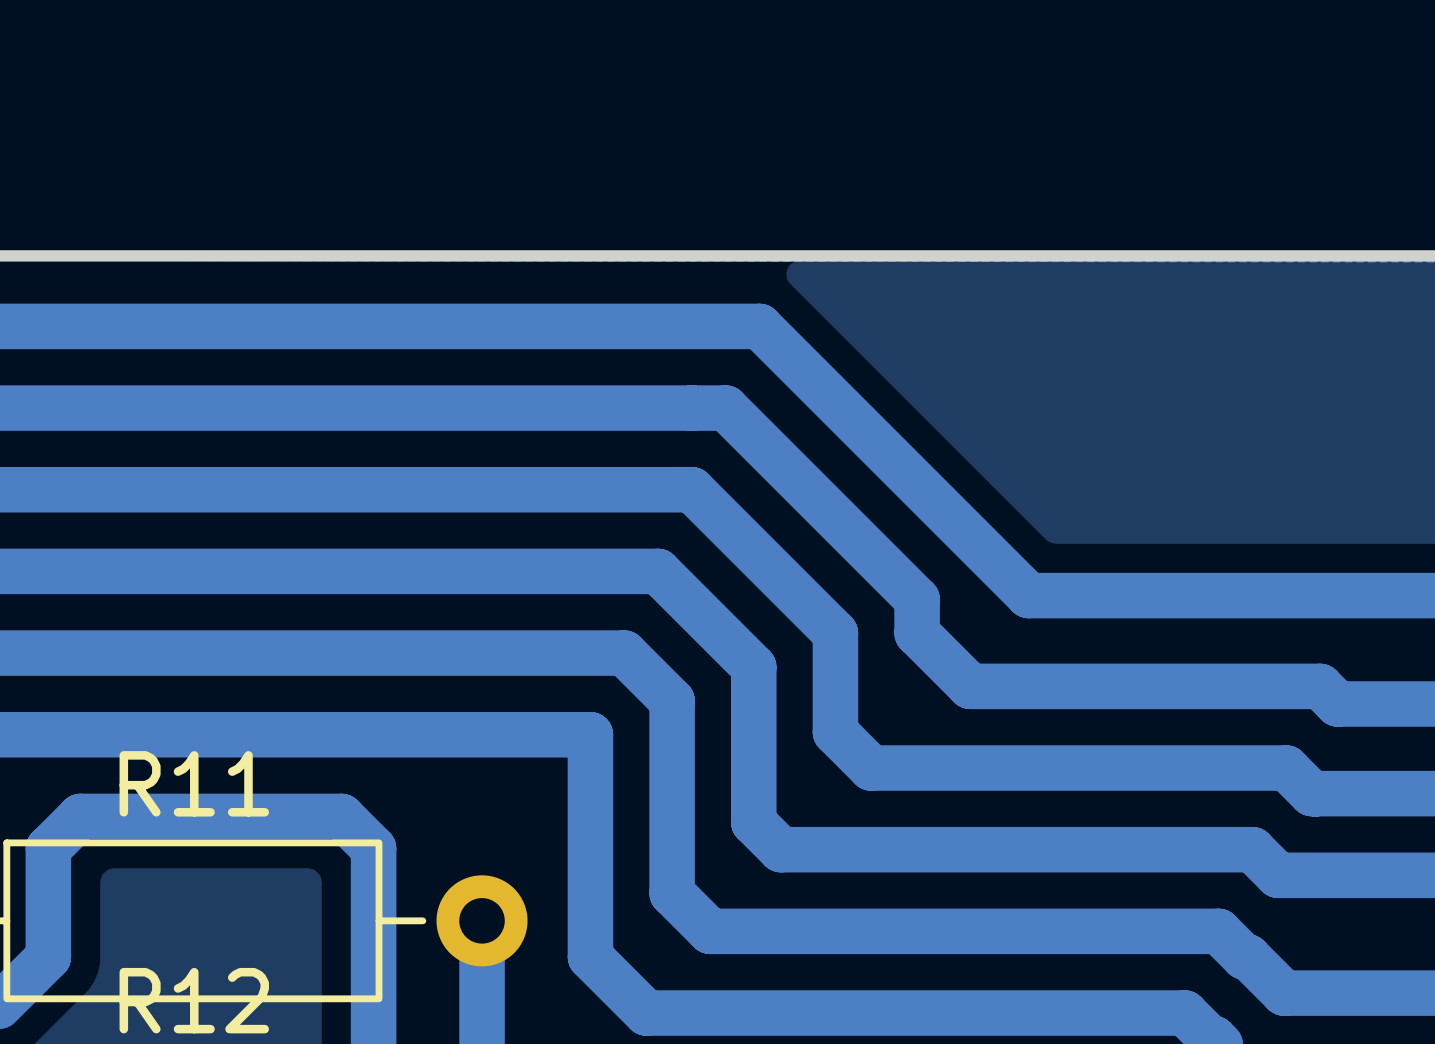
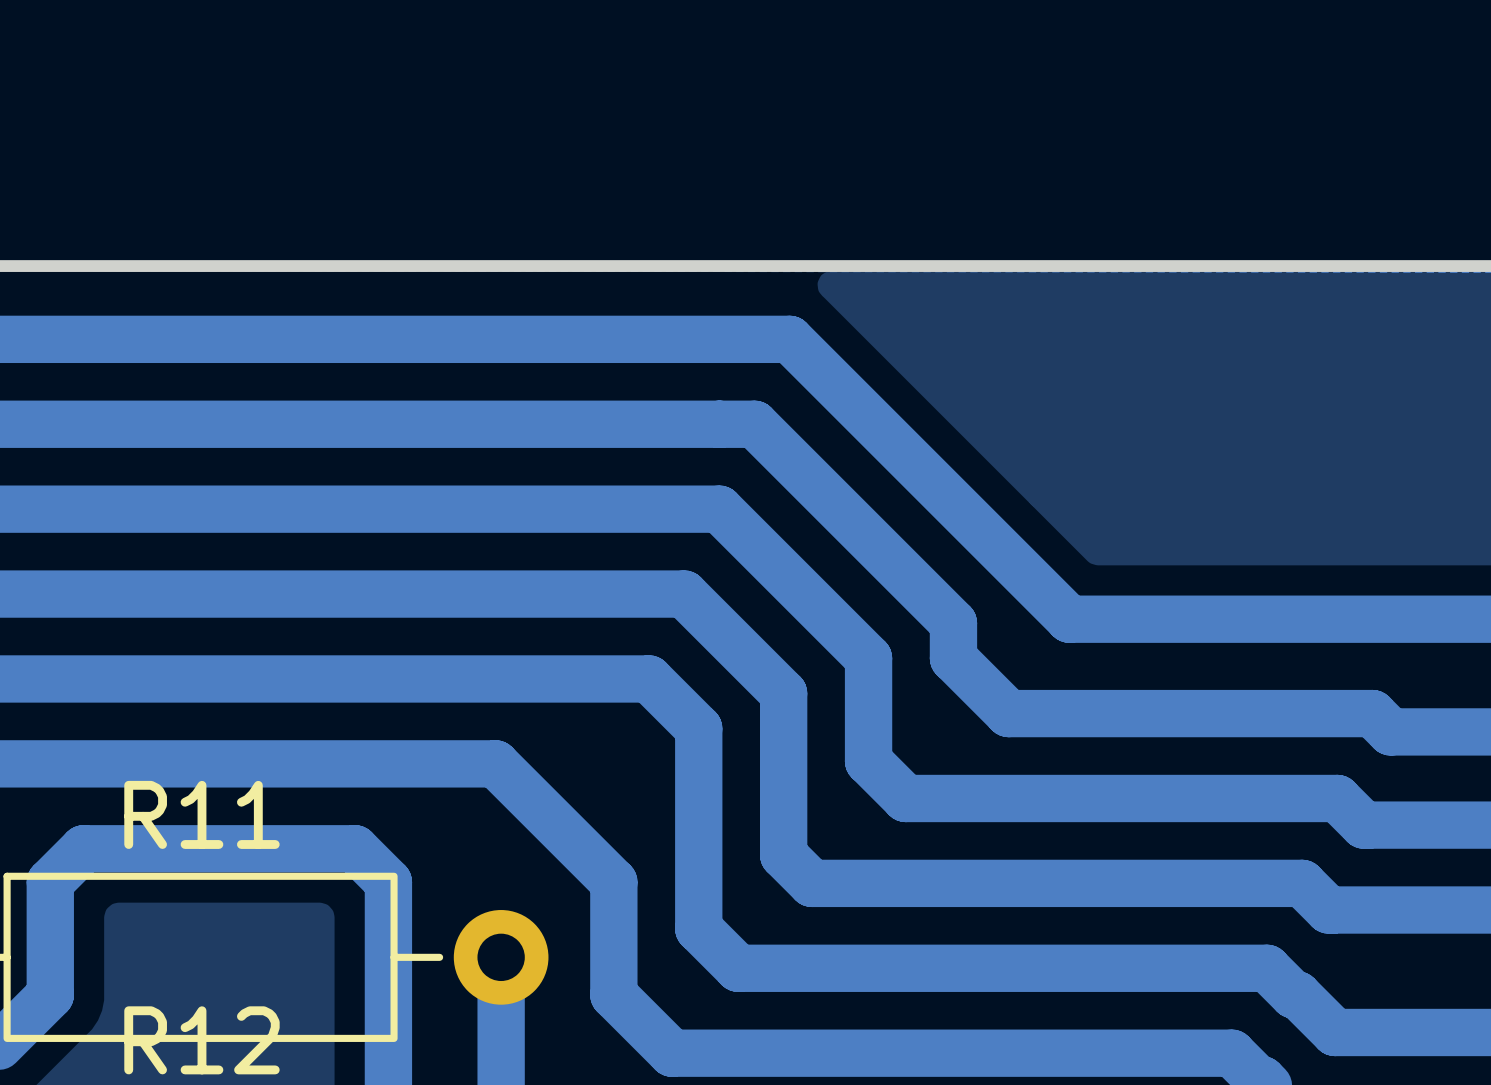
bottom track: (476, 734) (590, 734) (590, 848) -> (495, 763) (613, 882)

